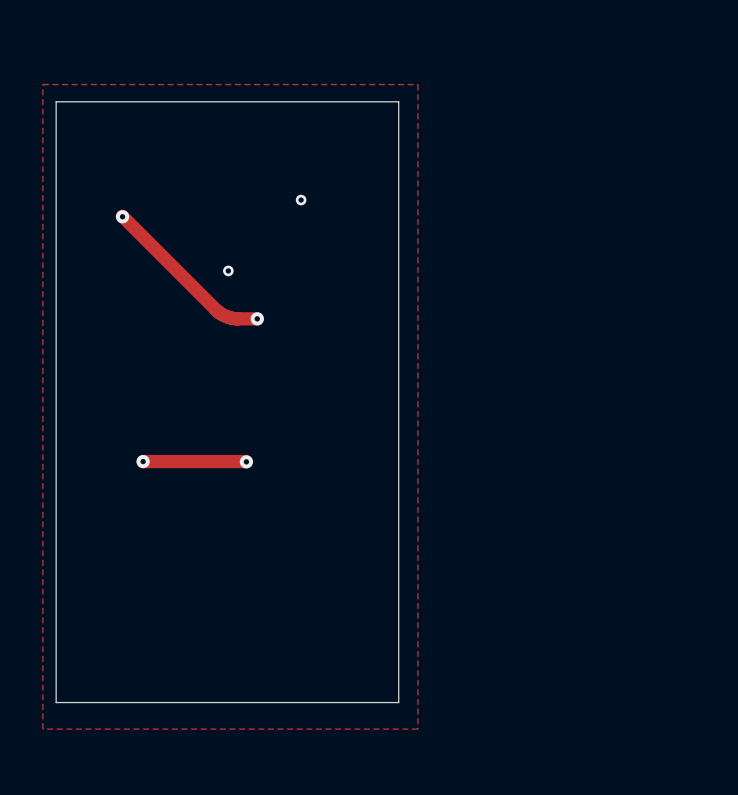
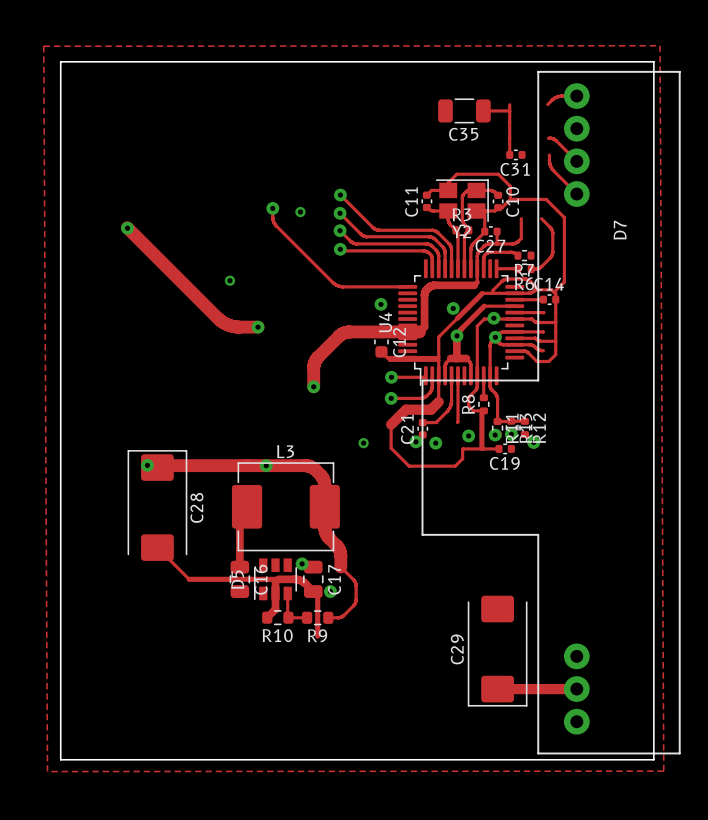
board edge: none -> (60, 61) (60, 759) (653, 759) (653, 61) (60, 61)
track: none -> (576, 96) (558, 96) (547, 104)
zone outline: (42, 84) (42, 729) (417, 729) (417, 84) (42, 84) -> (660, 45) (43, 46) (47, 771) (663, 771) (660, 45)
track: none -> (509, 104) (509, 154)
C35: none -> (464, 110)
track: none -> (483, 110) (509, 111)
board edge: (56, 101) (56, 702) (398, 702) (398, 101) (56, 101) -> none
track: none -> (548, 138) (555, 140) (576, 161)
C31: none -> (515, 154)
track: none -> (549, 155) (552, 168) (576, 194)
track: none -> (340, 195) (376, 229) (436, 231) (450, 246) (451, 268)
via: none -> (340, 195)
track: none -> (426, 195) (431, 190) (448, 190) (448, 182) (456, 174) (498, 174) (510, 186) (510, 199)
track: none -> (498, 195) (491, 190) (470, 190) (462, 195) (462, 220) (468, 229) (464, 237) (464, 268)
track: none -> (510, 199) (502, 207) (498, 207) (494, 211) (476, 211)
track: none -> (510, 199) (546, 199) (564, 217) (564, 281) (554, 292)
Y2: none -> (462, 200)
C11: none -> (426, 201)
C10: none -> (498, 201)
track: none -> (426, 207) (432, 210) (448, 211) (448, 222) (457, 234) (457, 268)
track: none -> (272, 208) (272, 219) (275, 225) (335, 284) (342, 286) (407, 286)
via: none -> (272, 208)
track: none -> (485, 211) (484, 232) (471, 247) (470, 268)
track: none -> (340, 213) (365, 236) (433, 237) (444, 249) (445, 268)
via: none -> (340, 213)
track: none -> (521, 218) (521, 238) (517, 242) (488, 244) (479, 251) (477, 256) (477, 282) (474, 285) (433, 285) (426, 289) (424, 295) (424, 326) (419, 331) (349, 331) (342, 333) (315, 360) (313, 386)
track: none -> (541, 218) (552, 231) (552, 253) (540, 267) (531, 269)
R3: none -> (462, 230)
track: none -> (340, 230) (355, 243) (429, 244) (437, 253) (438, 268)
via: none -> (340, 230)
C27: none -> (490, 231)
track: none -> (497, 231) (497, 243)
track: none -> (340, 249) (341, 250) (424, 251) (431, 256) (432, 268)
via: none -> (340, 249)
track: none -> (517, 255) (511, 252) (488, 252) (483, 257) (483, 268)
R7: none -> (524, 255)
track: none -> (496, 268) (518, 269)
R6: none -> (524, 269)
track: none -> (535, 289) (551, 289) (555, 293) (555, 354) (548, 361) (536, 361) (526, 351) (514, 351)
track: none -> (535, 289) (528, 293) (482, 293) (438, 337) (438, 401) (430, 409) (406, 409) (391, 424) (391, 448) (409, 466) (455, 466) (462, 458) (463, 448) (499, 448)
track: none -> (535, 289) (535, 286) (527, 279) (507, 279) (493, 290) (493, 293)
track: none -> (514, 299) (543, 299)
C14: none -> (549, 299)
via: none -> (380, 304)
track: none -> (514, 306) (484, 306) (460, 330) (457, 345)
via: none -> (453, 308)
track: none -> (514, 312) (543, 312)
via: none -> (493, 318)
track: none -> (530, 319) (484, 319) (477, 326) (477, 386) (468, 397) (468, 406) (473, 410) (483, 410) (481, 413) (482, 448)
track: none -> (555, 321) (536, 322)
U4: none -> (461, 322)
track: none -> (543, 332) (502, 332) (490, 344) (490, 386) (497, 397) (497, 421) (524, 421)
via: none -> (456, 335)
track: none -> (495, 337) (495, 339) (501, 344) (530, 344) (543, 350)
via: none -> (495, 337)
track: none -> (514, 338) (534, 338)
track: none -> (456, 341) (456, 358)
track: none -> (540, 341) (555, 341)
C12: none -> (381, 341)
track: none -> (381, 351) (389, 360) (438, 360)
track: none -> (438, 357) (387, 357)
track: none -> (425, 375) (391, 377)
track: none -> (432, 375) (431, 389) (424, 397) (391, 398)
track: none -> (445, 375) (445, 364) (450, 358) (466, 358) (470, 363) (470, 375)
track: none -> (451, 375) (451, 401) (449, 408) (436, 422) (422, 422)
track: none -> (457, 375) (457, 422)
track: none -> (483, 375) (483, 397)
via: none -> (391, 377)
via: none -> (313, 386)
via: none -> (391, 398)
R8: none -> (483, 404)
D7: none -> (551, 412)
R13: none -> (511, 427)
R12: none -> (524, 427)
C21: none -> (422, 428)
R11: none -> (497, 428)
via: none -> (511, 434)
via: none -> (495, 435)
via: none -> (468, 435)
via: none -> (415, 441)
via: none -> (533, 442)
via: none -> (363, 443)
via: none -> (435, 443)
C19: none -> (505, 448)
track: (143, 461) (246, 461) -> none
via position: (246, 461) -> (266, 465)
track: none -> (157, 467) (159, 465) (304, 465) (315, 469) (322, 477) (324, 483) (325, 532) (339, 550) (340, 566) (354, 580) (356, 585) (356, 600) (354, 605) (341, 616) (328, 617)
C28: none -> (157, 505)
track: none -> (247, 506) (239, 513) (239, 569)
L3: none -> (285, 506)
track: none -> (157, 547) (189, 579) (294, 579) (301, 581) (317, 596) (317, 636)
via: none -> (302, 563)
C16: none -> (239, 579)
D5: none -> (275, 579)
C17: none -> (313, 579)
track: none -> (275, 582) (275, 609) (267, 617)
via: none -> (330, 591)
track: none -> (287, 593) (287, 616) (306, 617)
R10: none -> (277, 617)
R9: none -> (317, 617)
C29: none -> (497, 651)
track: none -> (497, 689) (576, 689)

